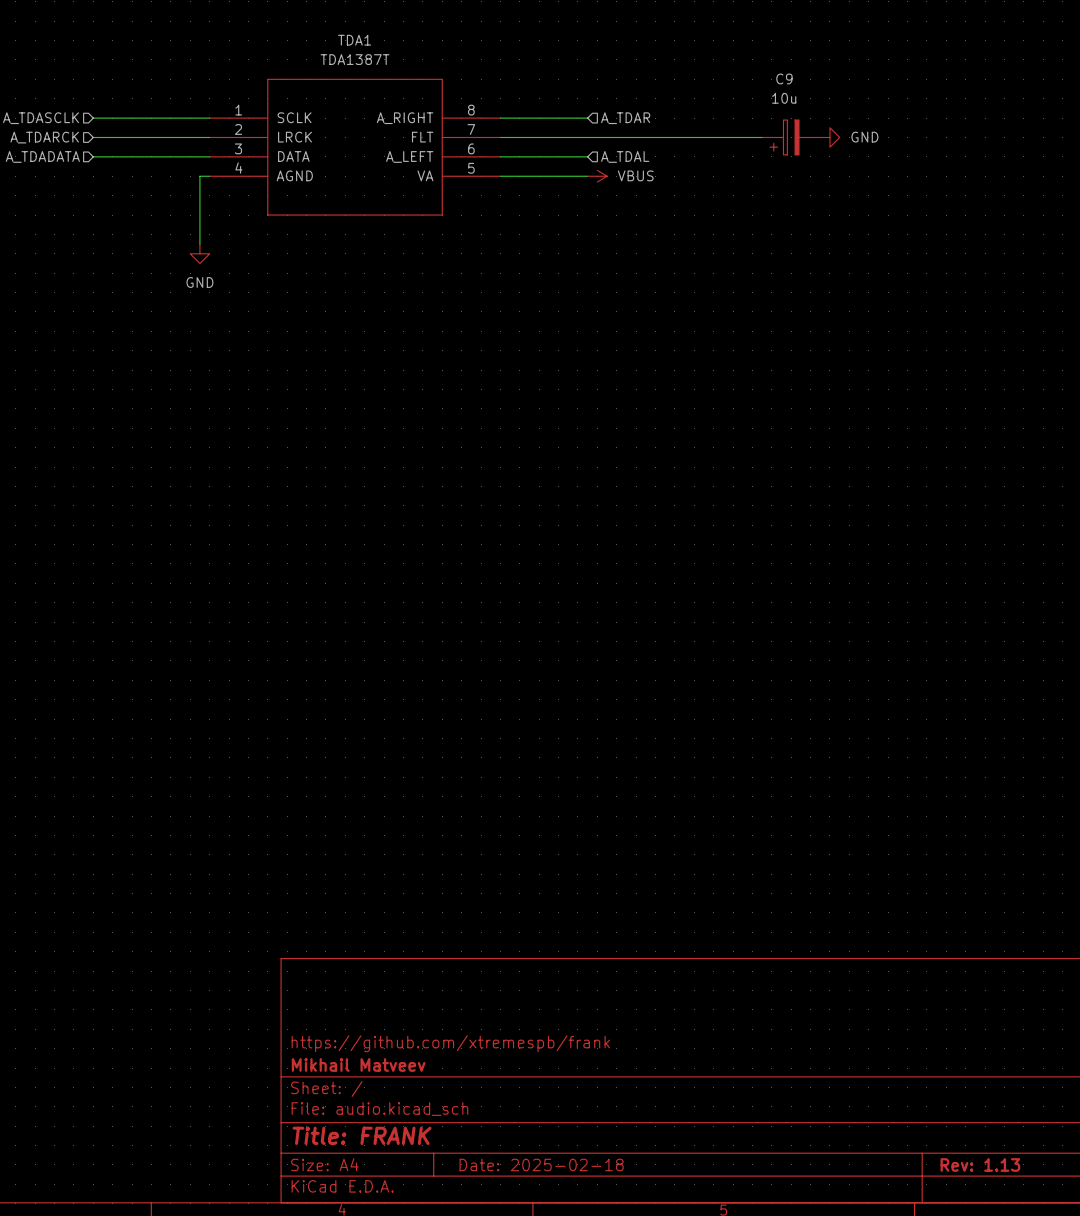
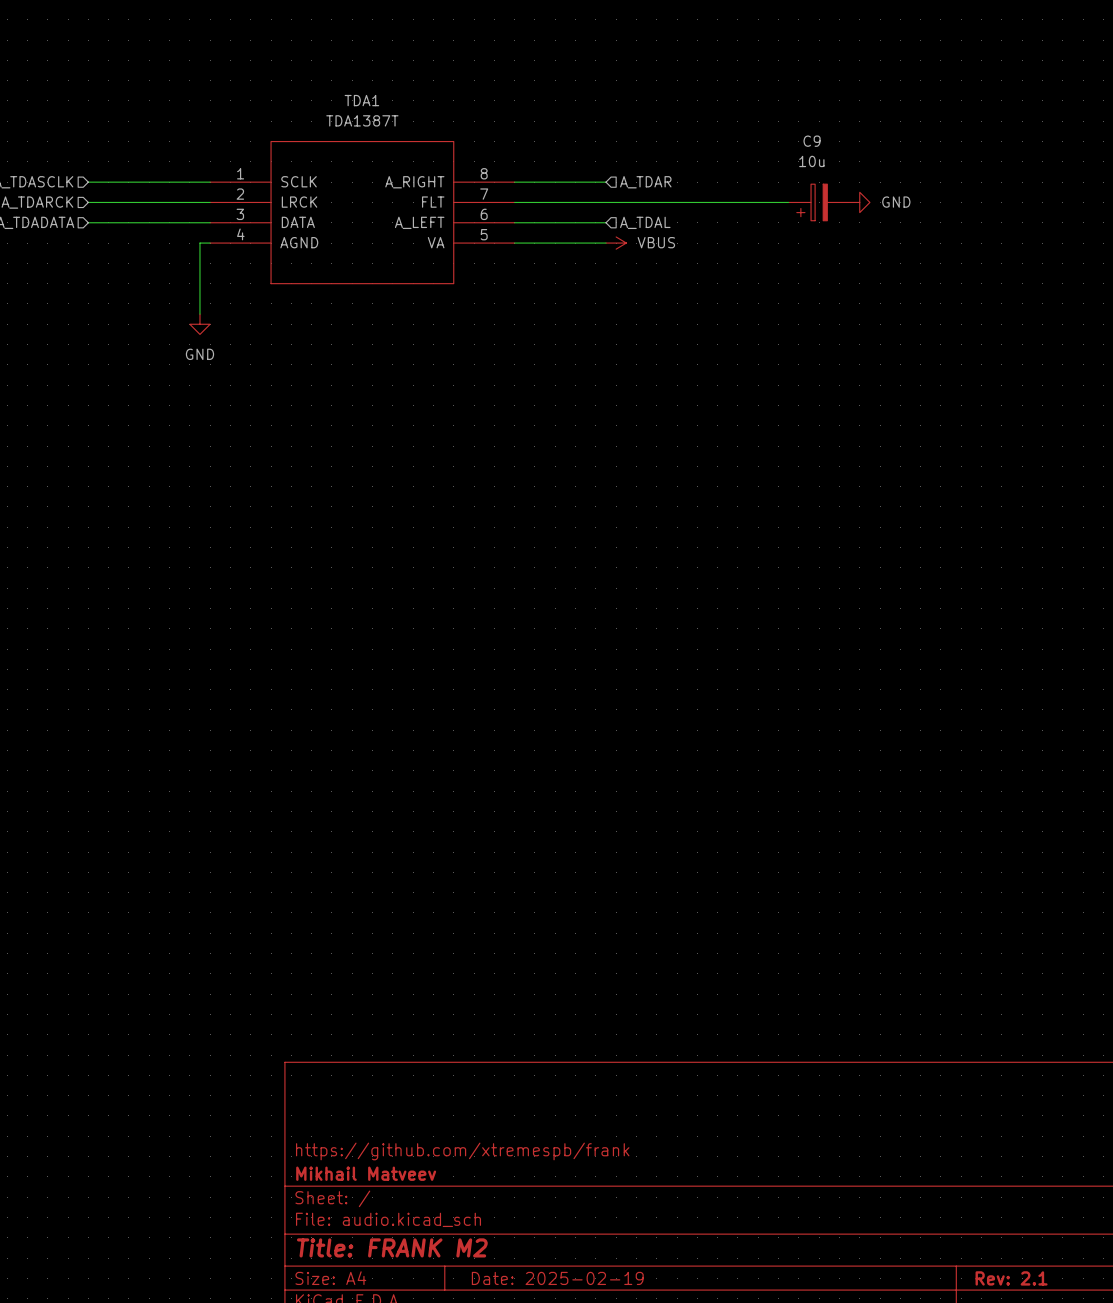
title block: Title: FRANK (362, 1135) -> Title: FRANK M2 (392, 1247)
title block: Date: 2025-02-18 (541, 1164) -> Date: 2025-02-19 (557, 1278)
title block: Rev: 1.13 (980, 1164) -> Rev: 2.1 (1011, 1278)

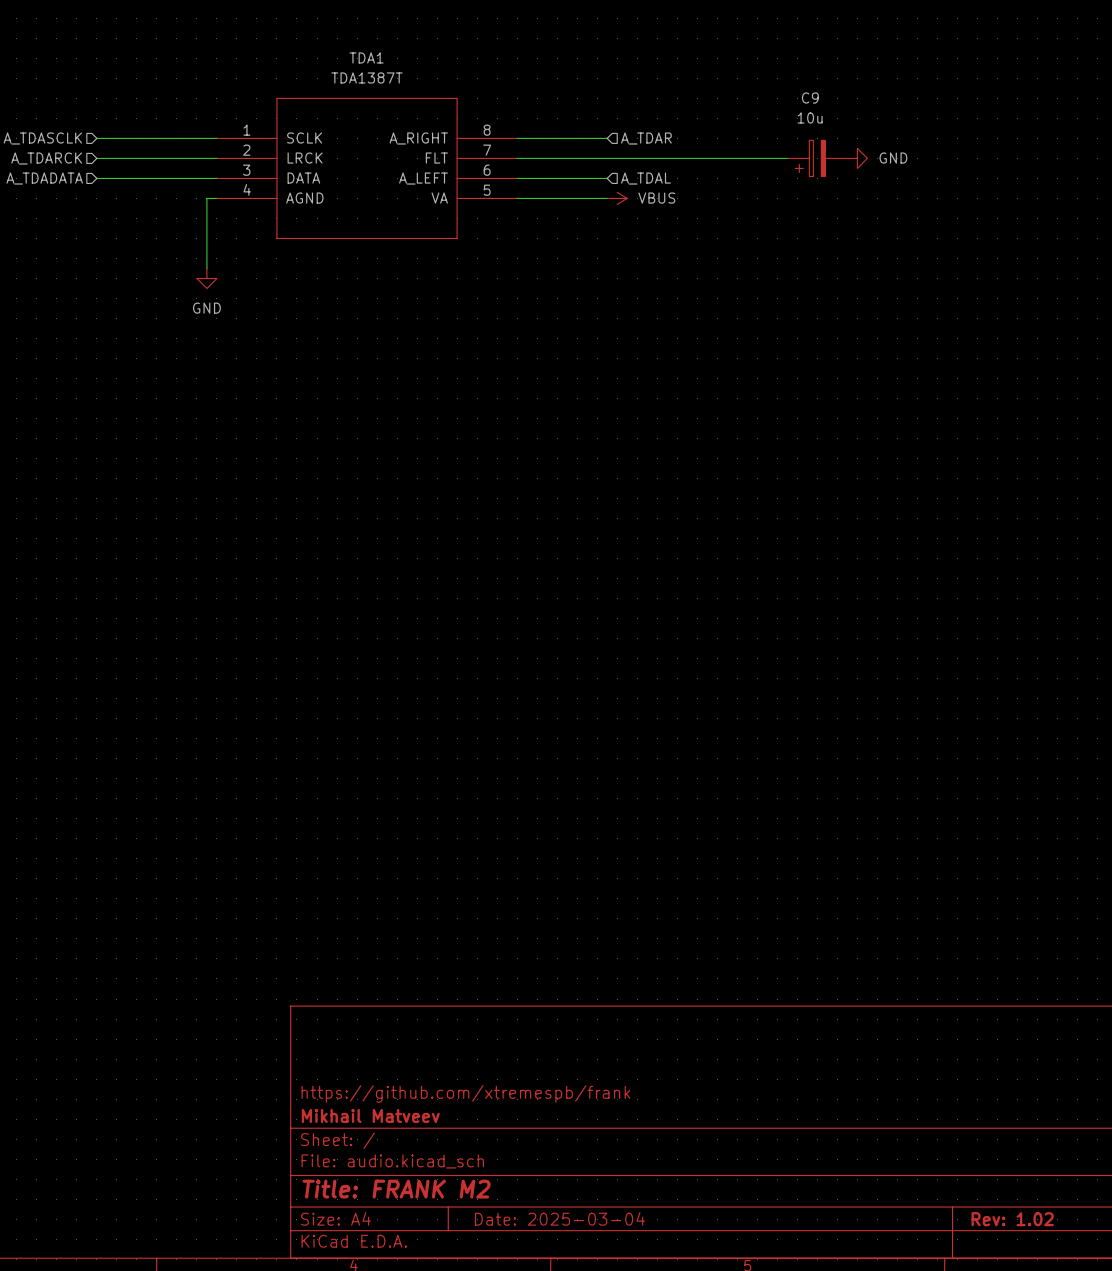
title block: Date: 2025-02-19 (557, 1278) -> Date: 2025-03-04 (559, 1218)
title block: Rev: 2.1 (1011, 1278) -> Rev: 1.02 (1012, 1219)

